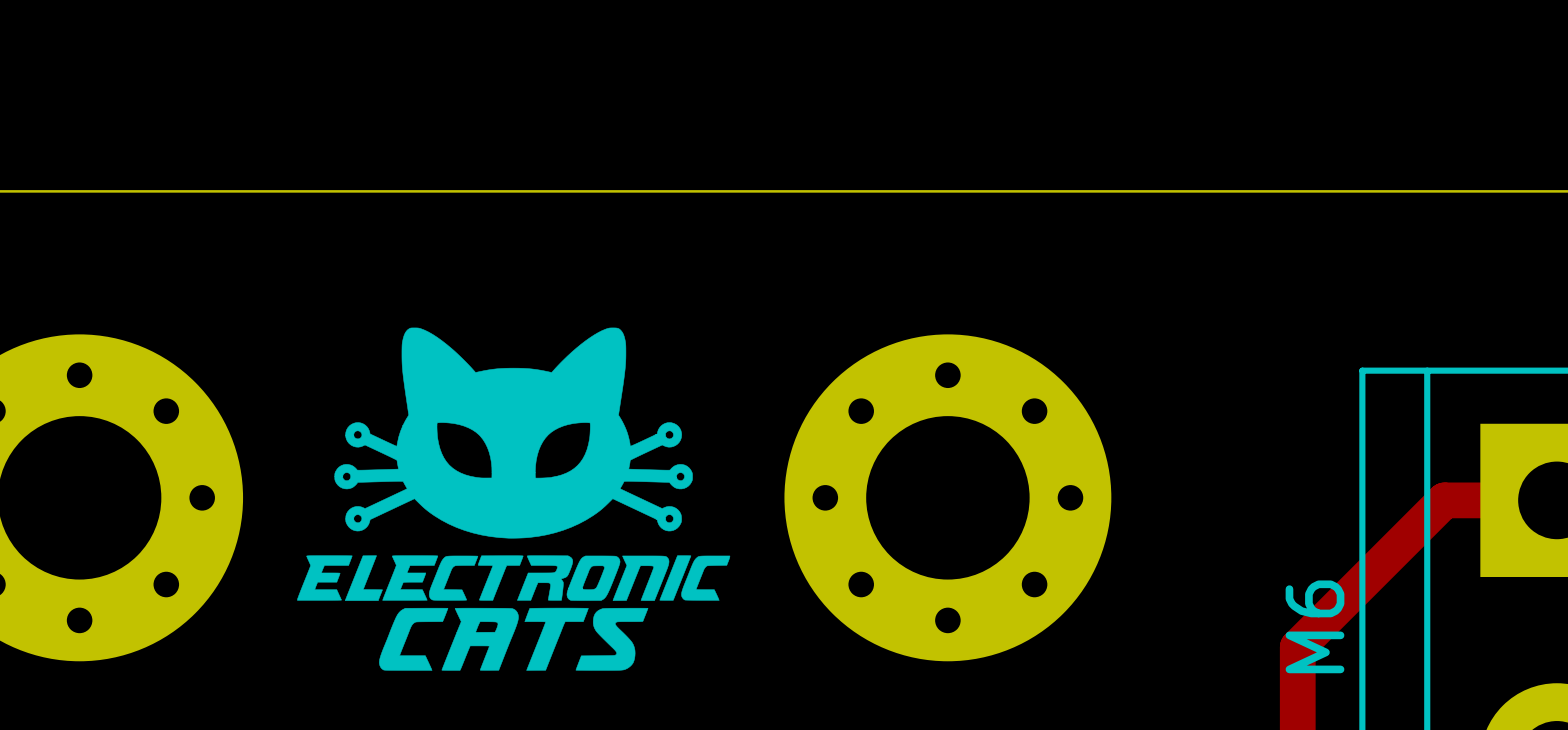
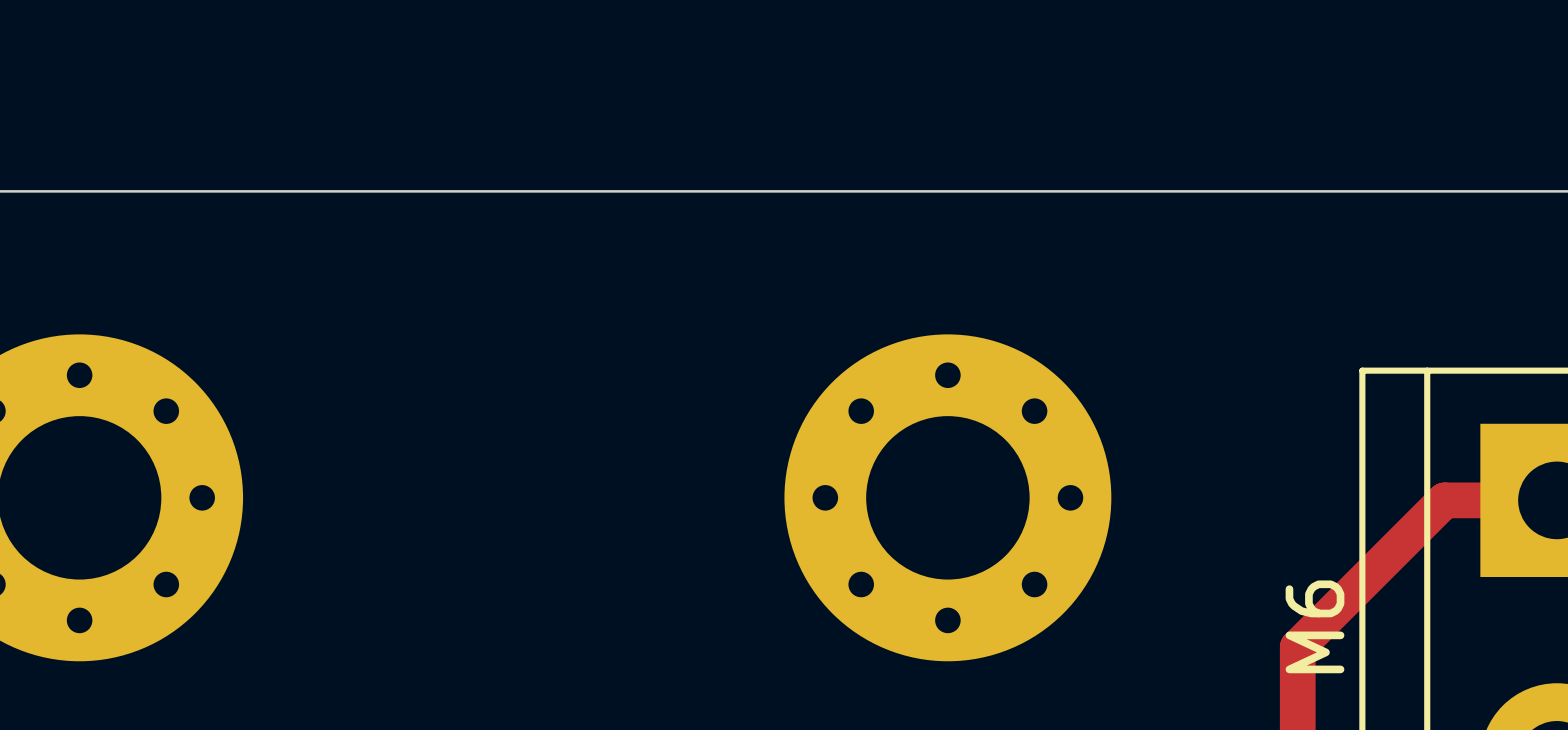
drawing: [297, 327, 731, 671] -> none

